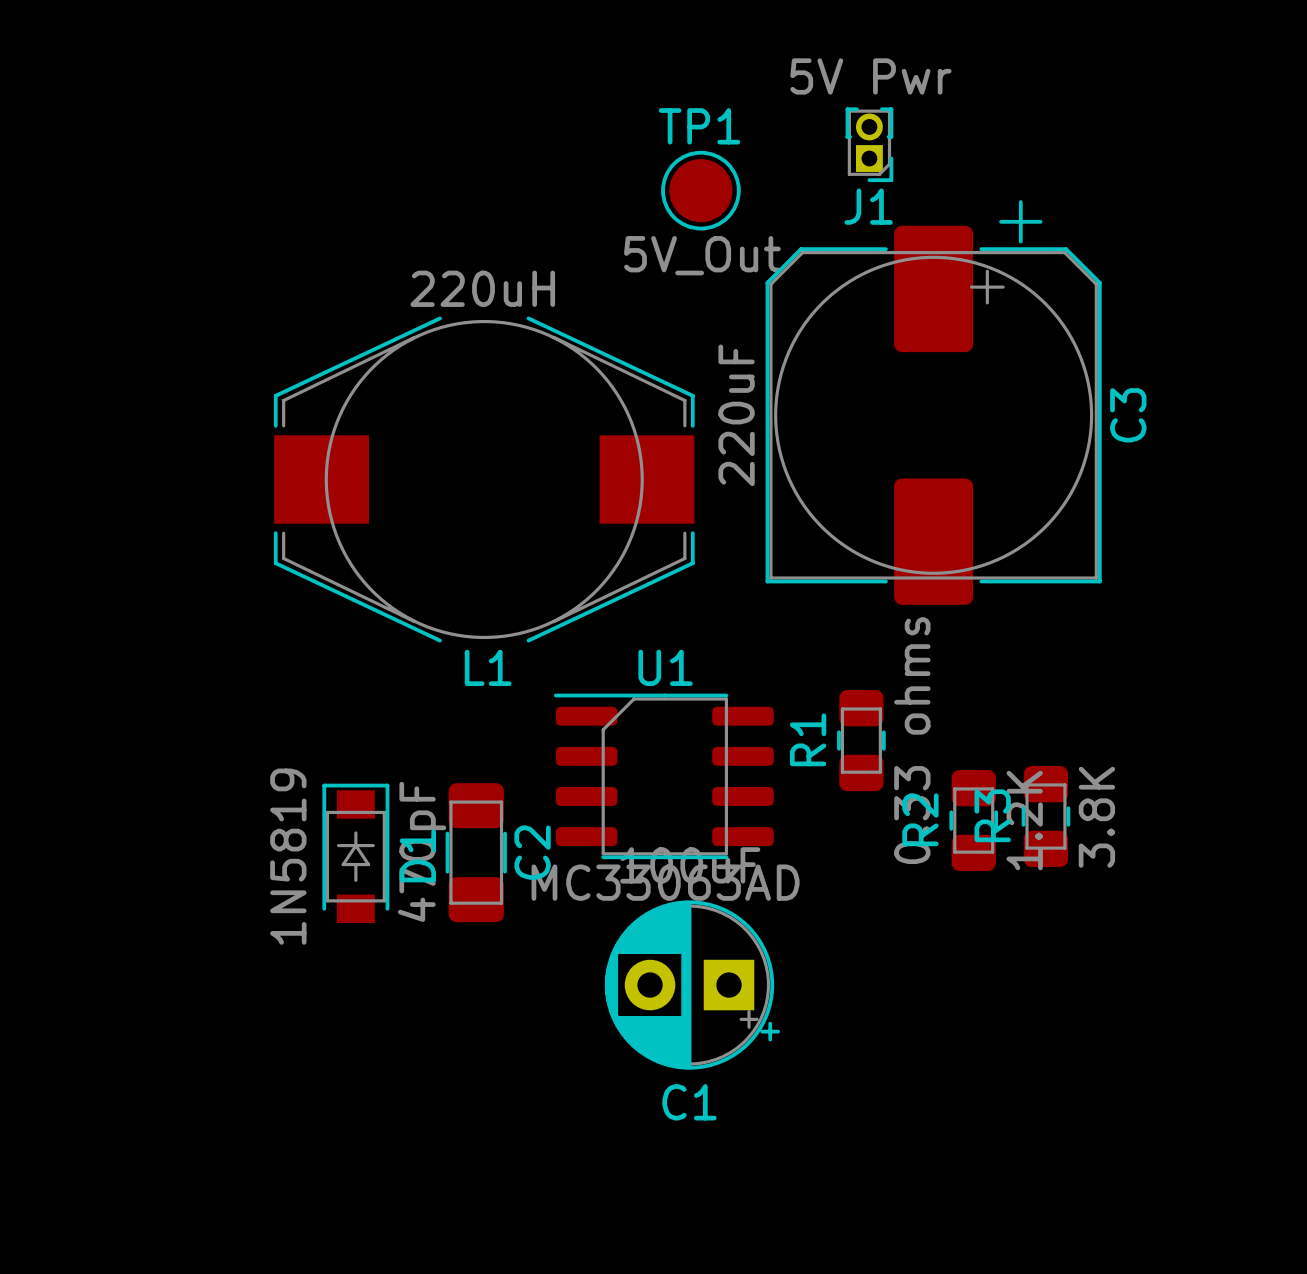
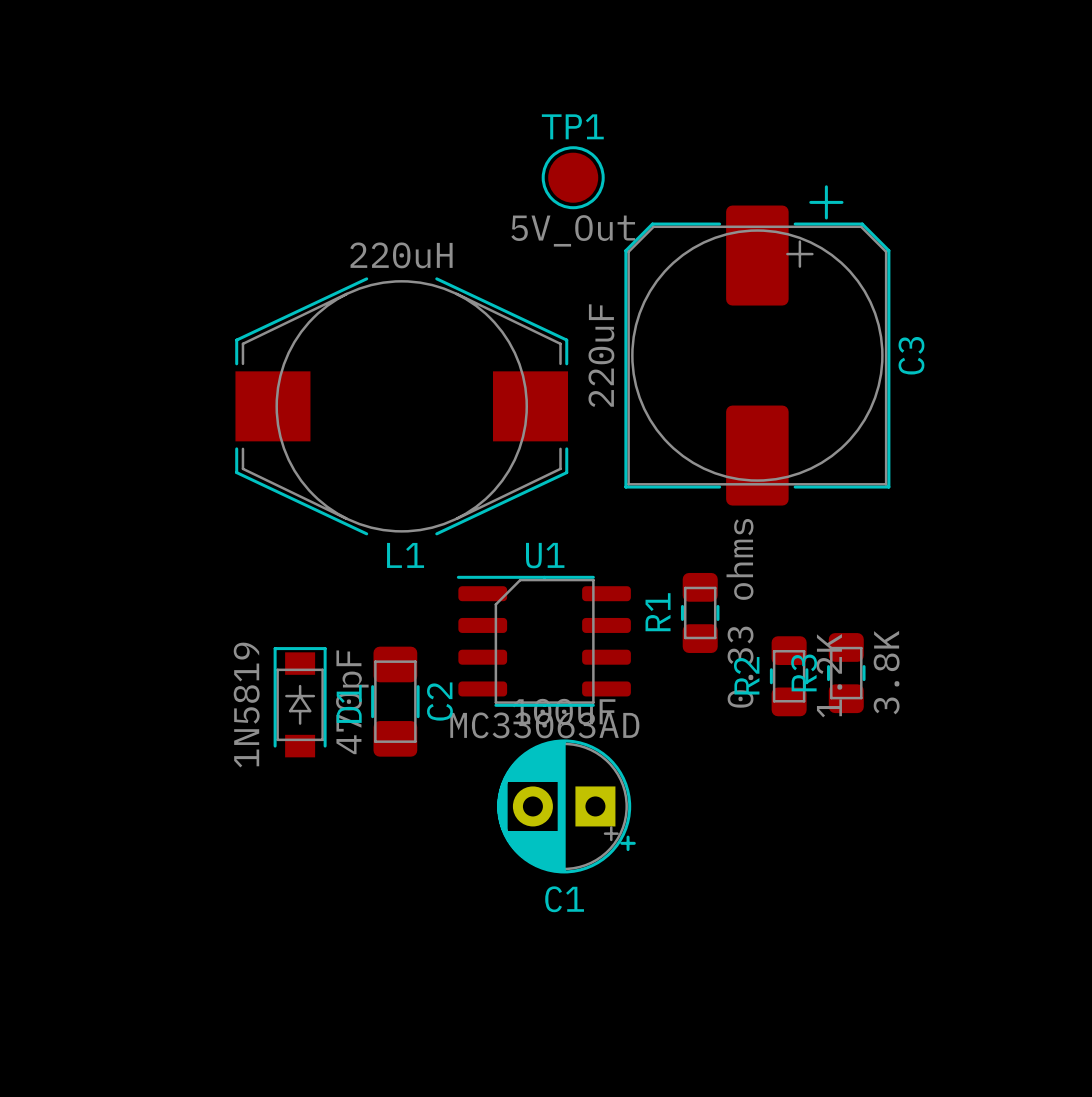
J1: 5V Pwr (869, 144) -> none

